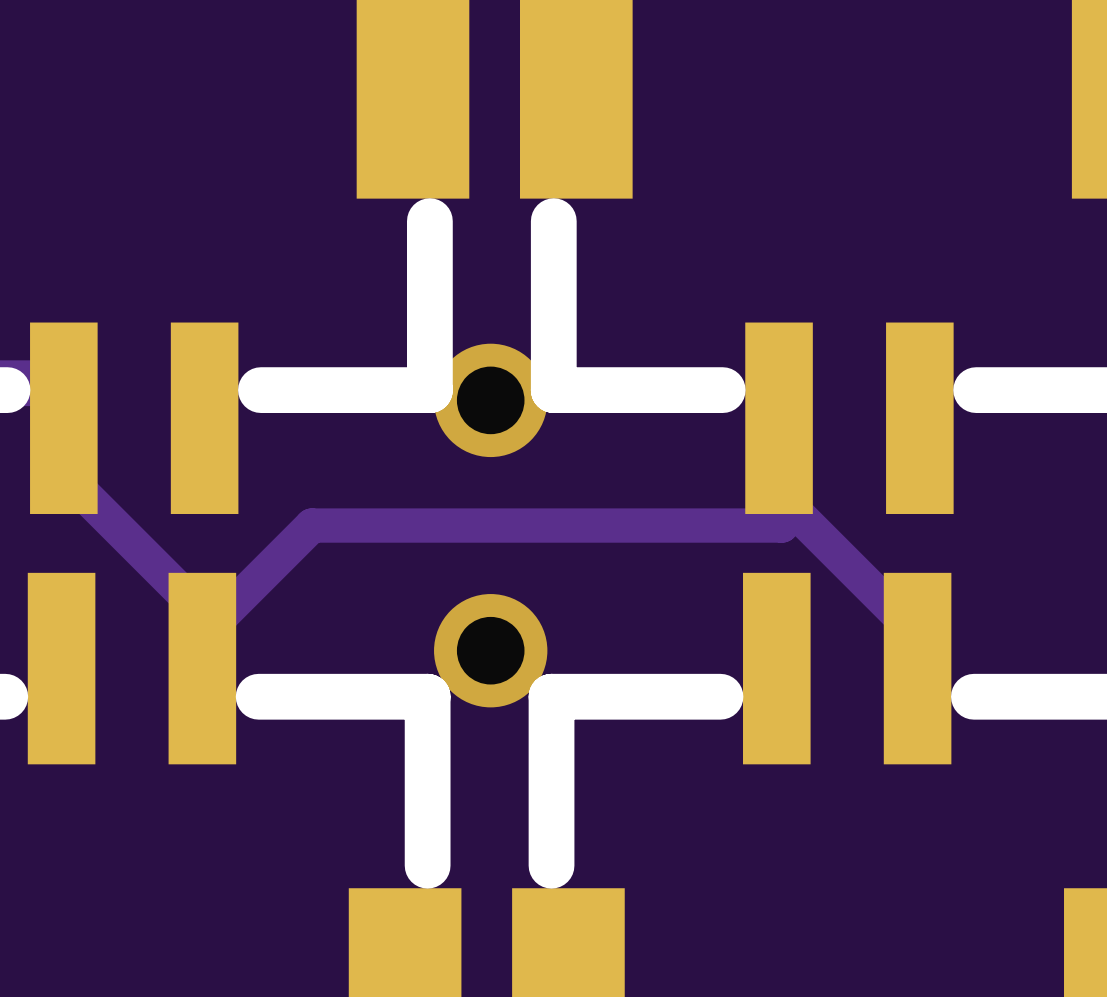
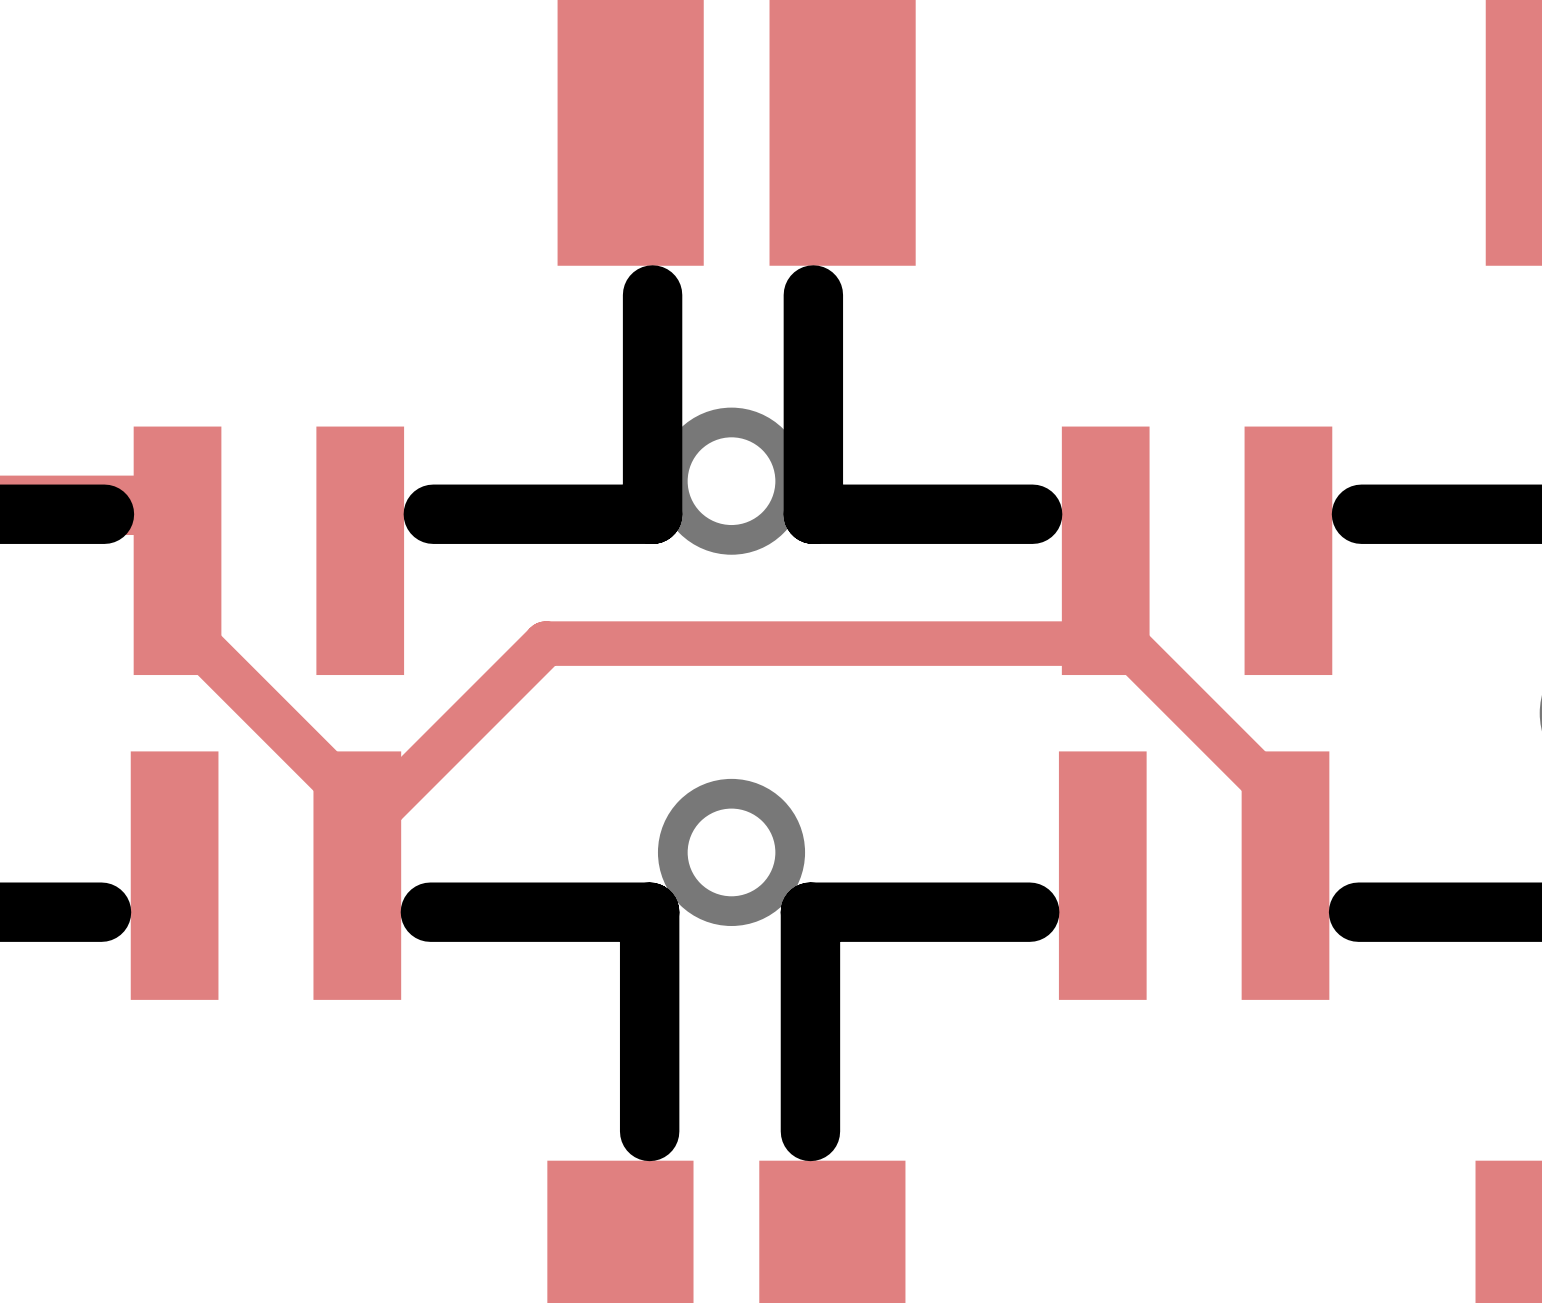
via position: (490, 400) -> (731, 481)
track: none -> (1125, 643) (1285, 803) (1285, 875)
track: (777, 511) (781, 525) (311, 525) -> (1125, 643) (545, 643) (499, 690)
track: (777, 511) (795, 511) (898, 614) -> none

